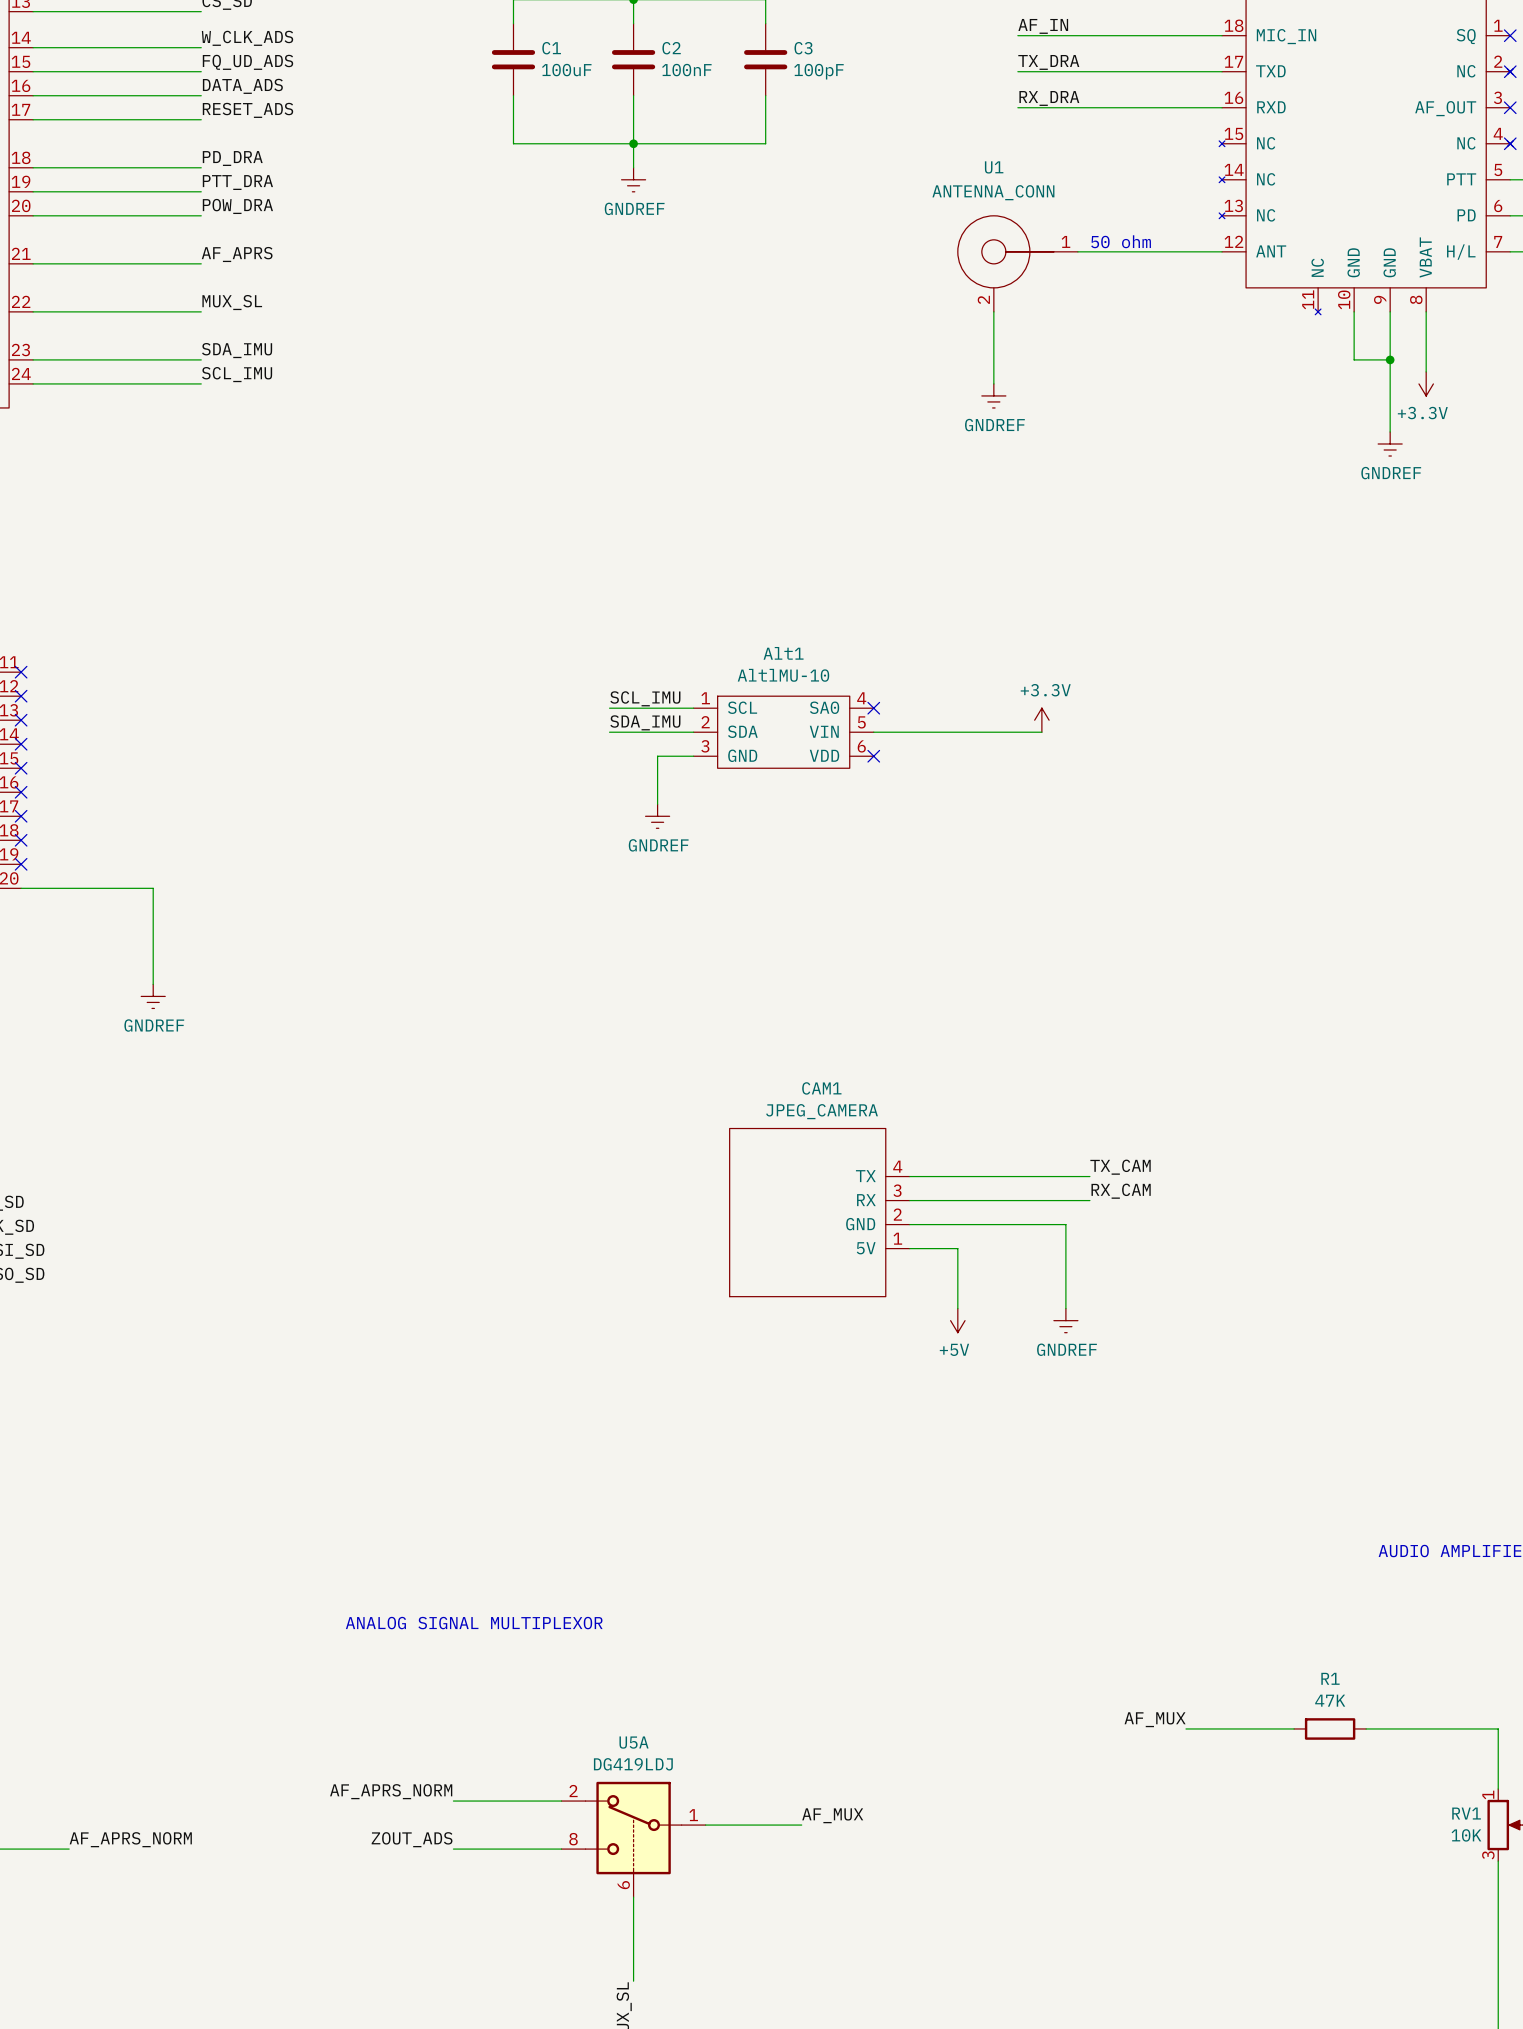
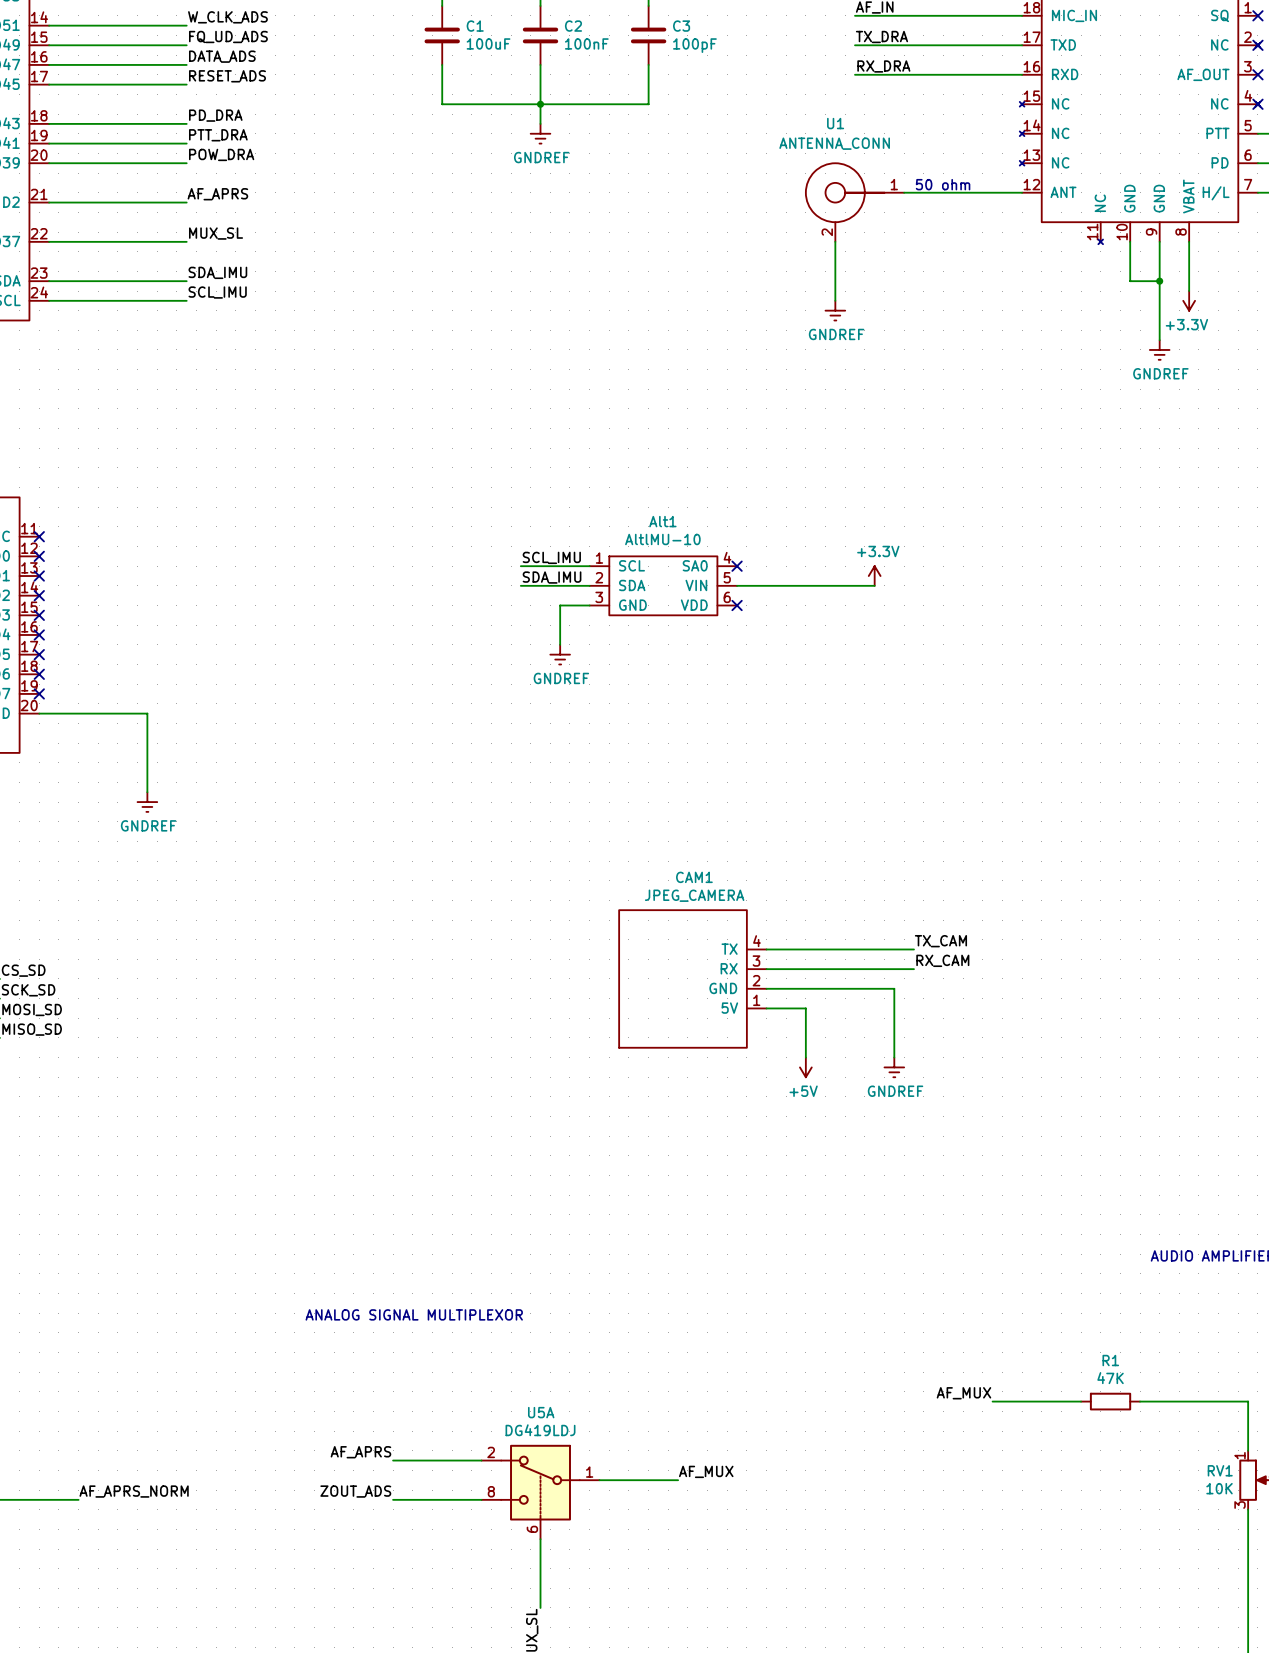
label: AF_APRS_NORM (391, 1791) -> AF_APRS (360, 1452)

